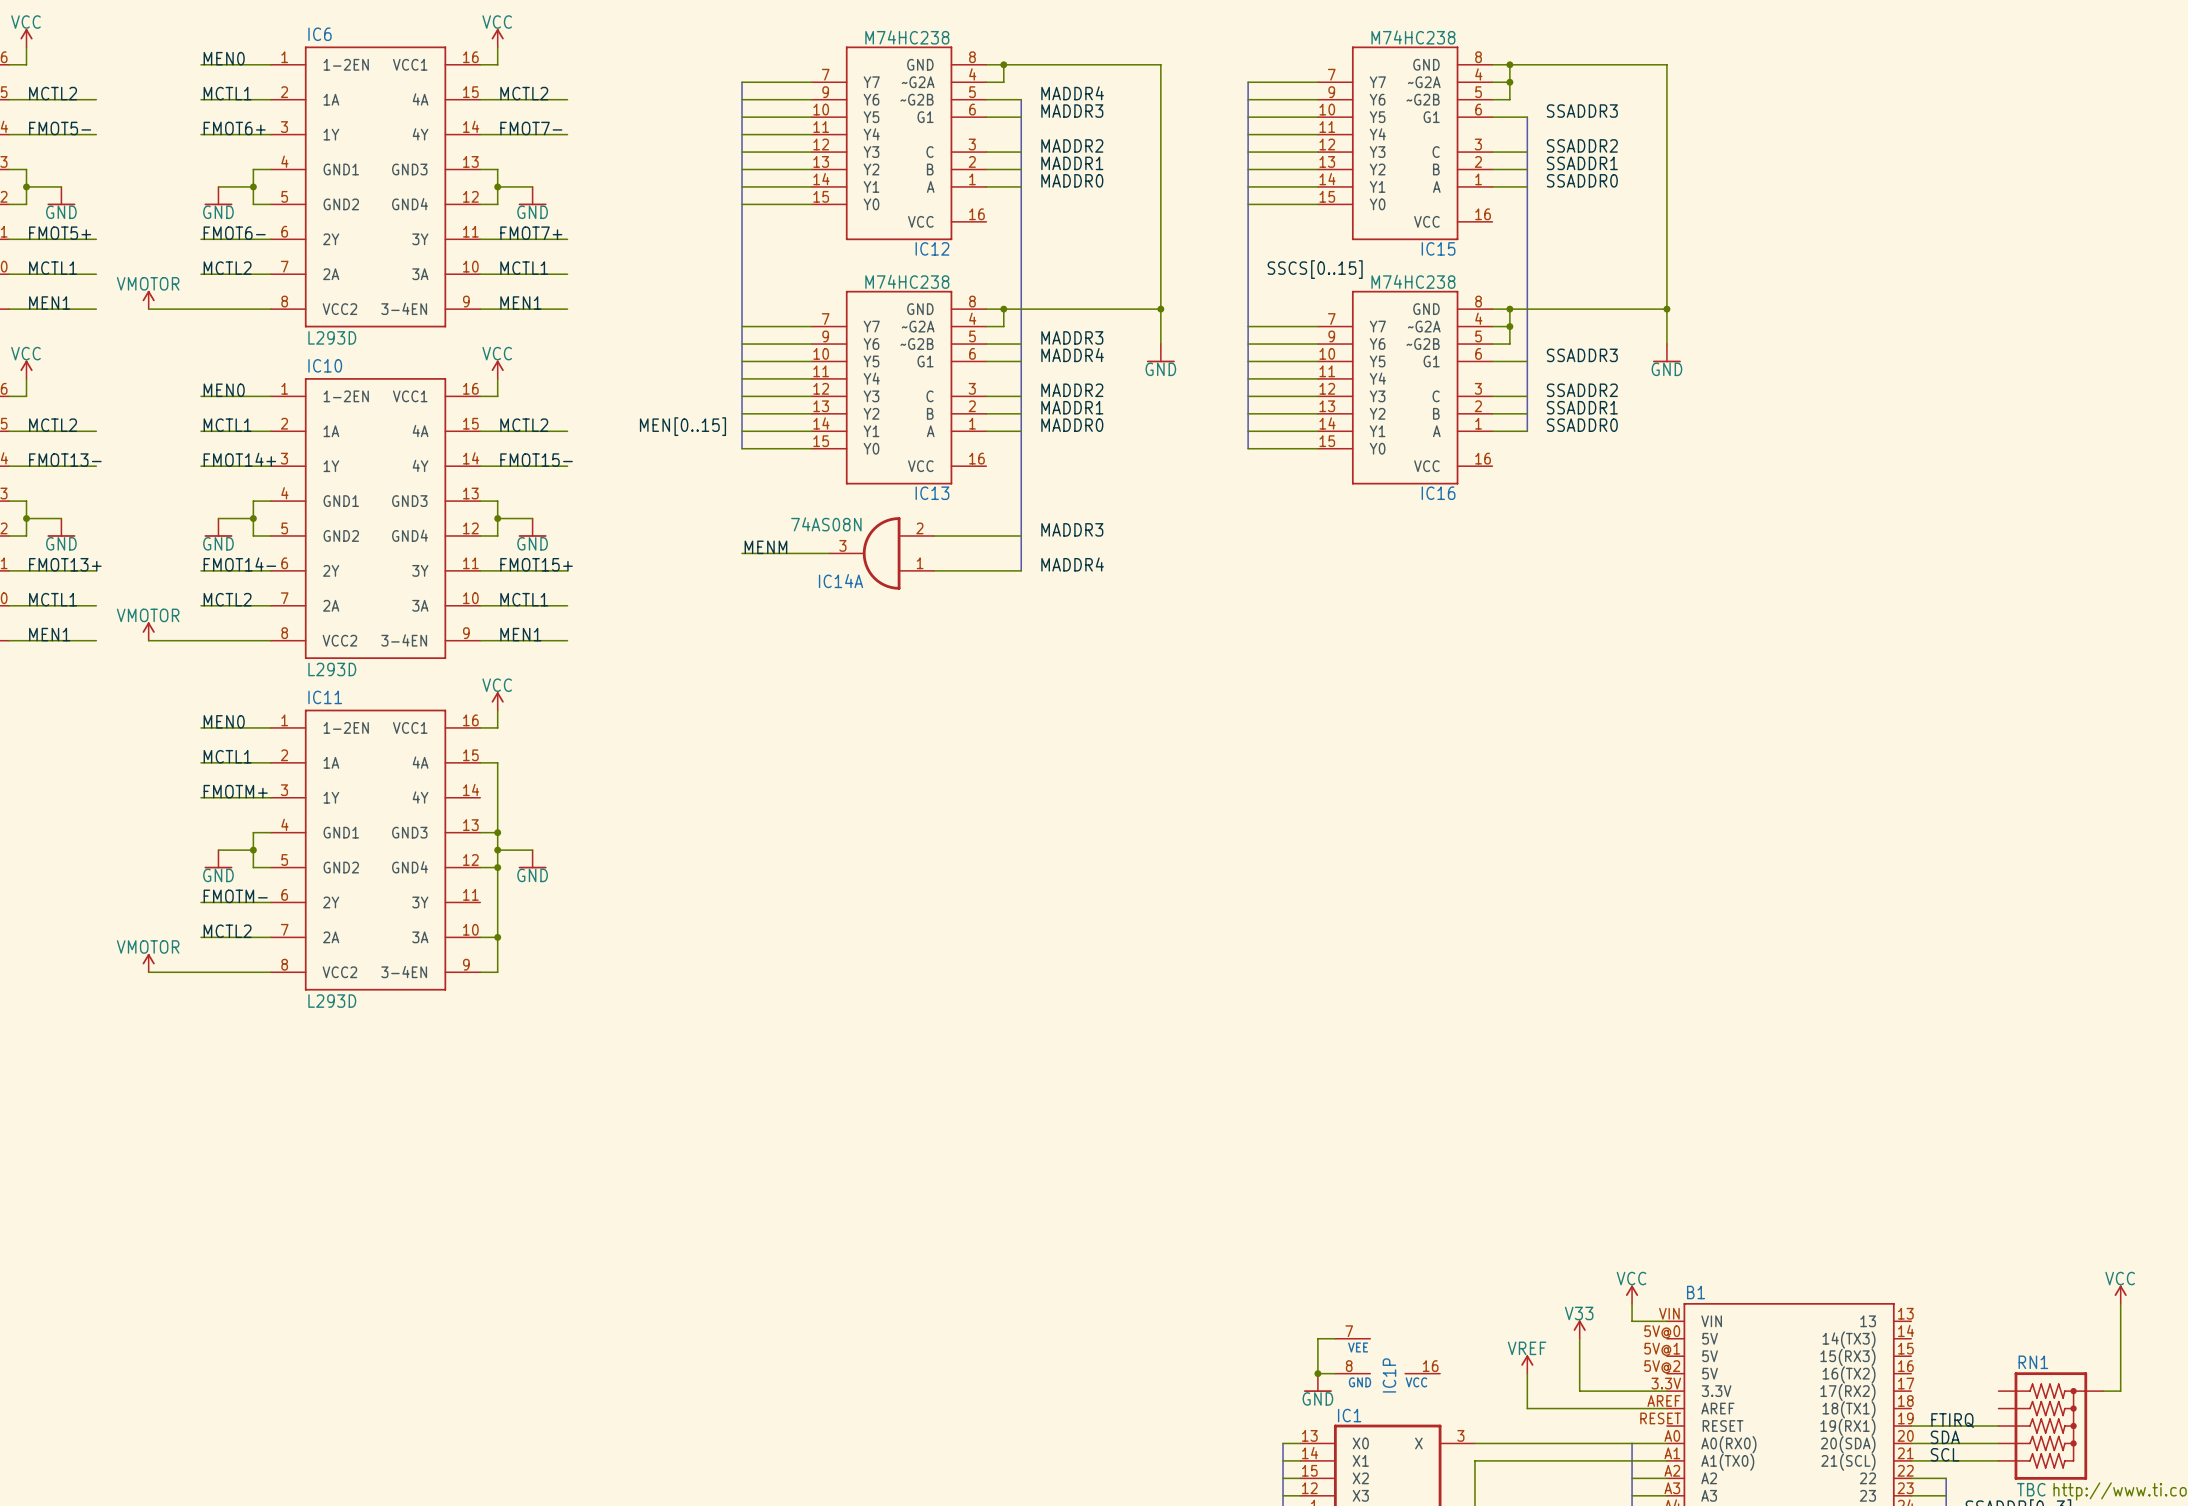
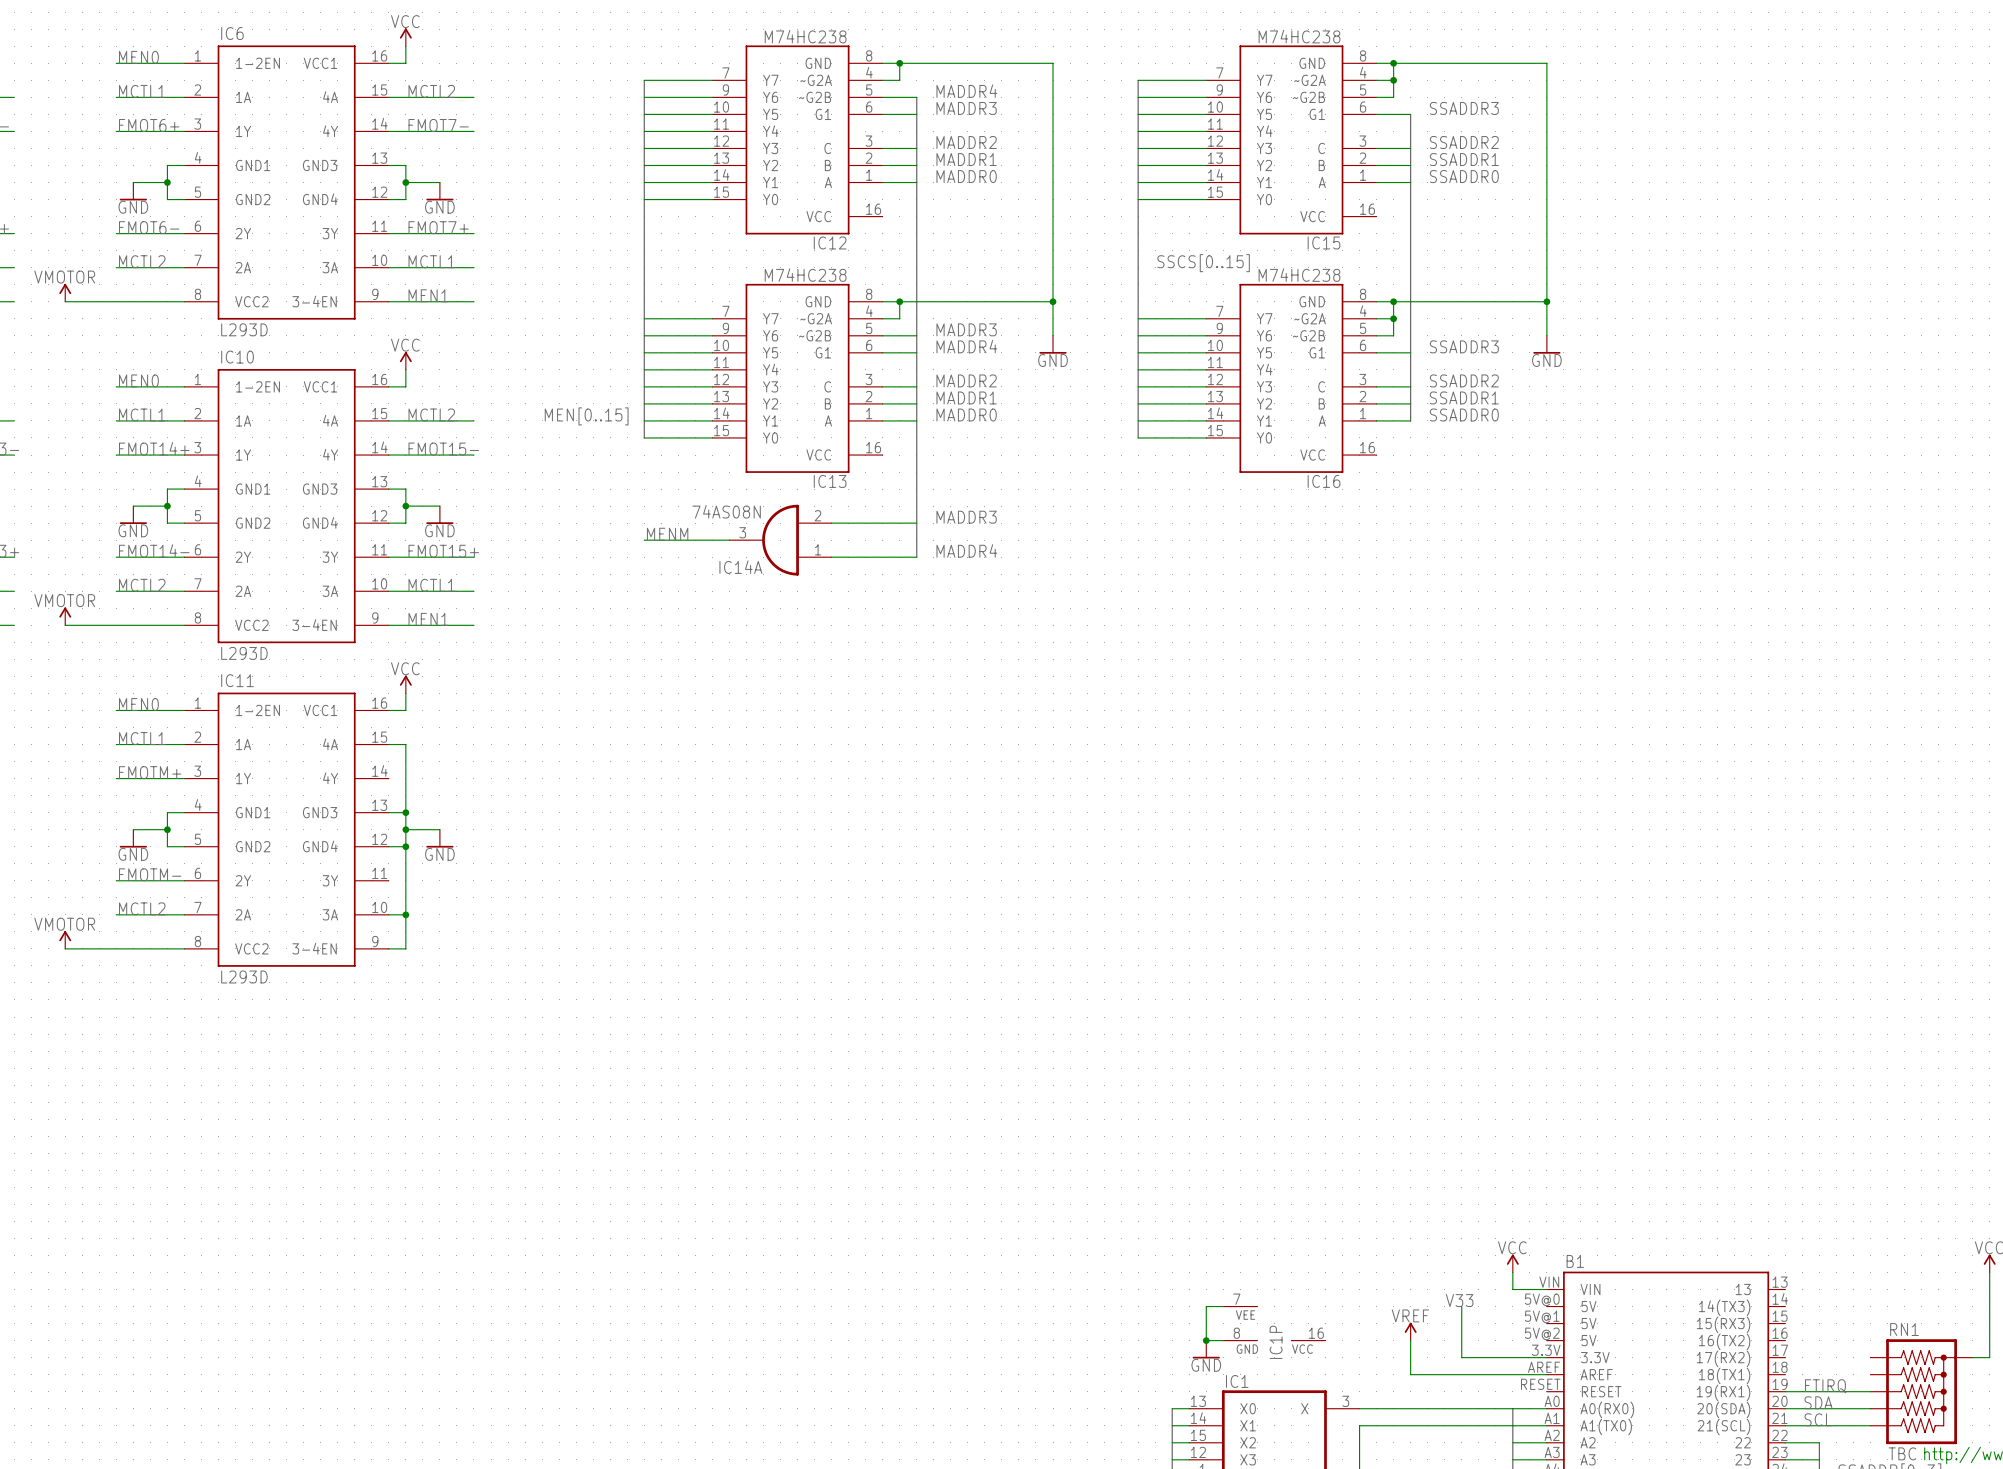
power symbol: V33 (1579, 1329) -> none
label: none -> V33 (1459, 1300)

